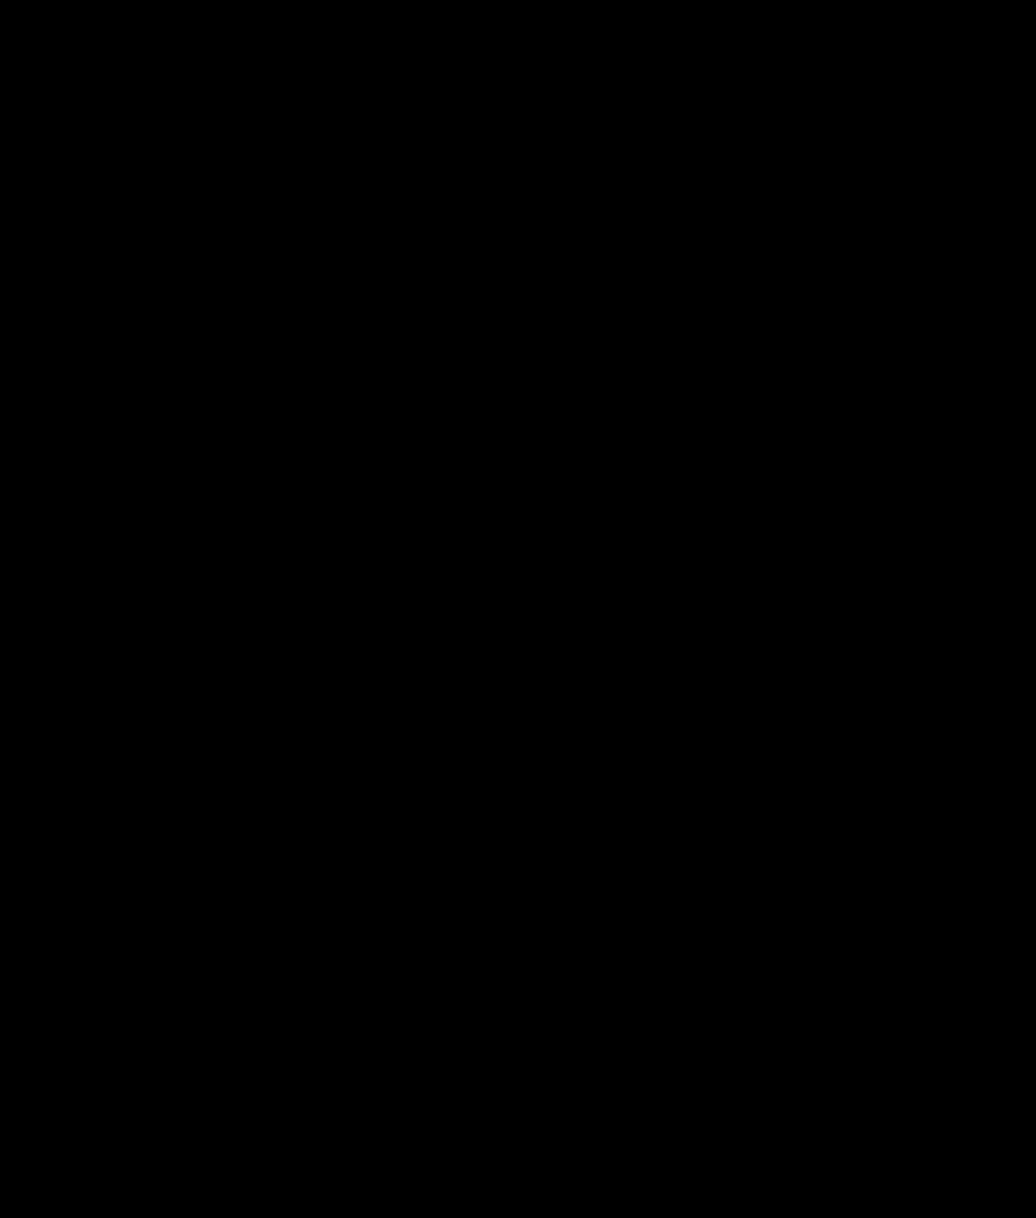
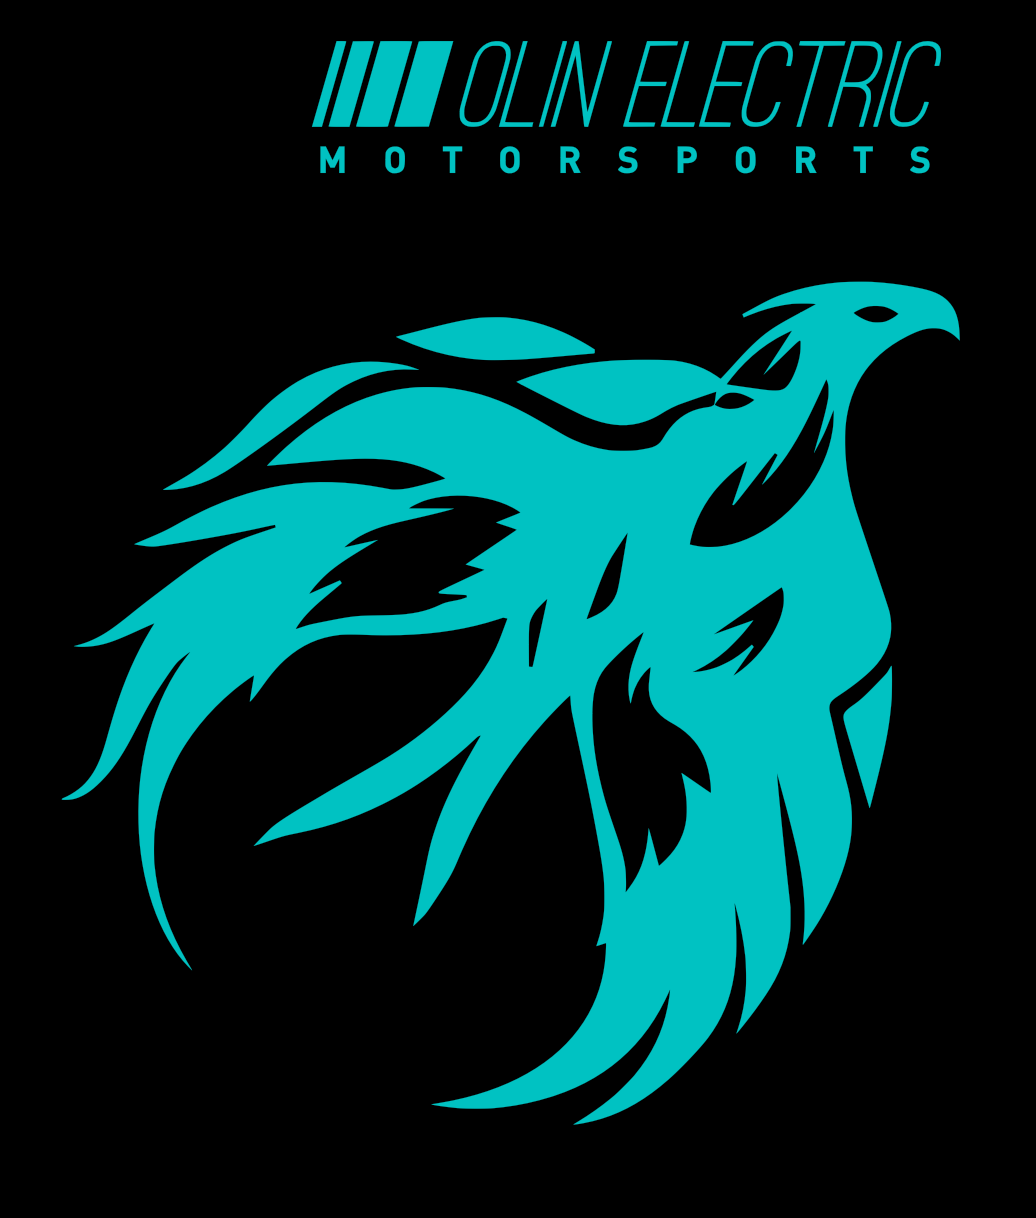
drawing: none -> [311, 41, 942, 174]
drawing: none -> [61, 281, 960, 1125]

